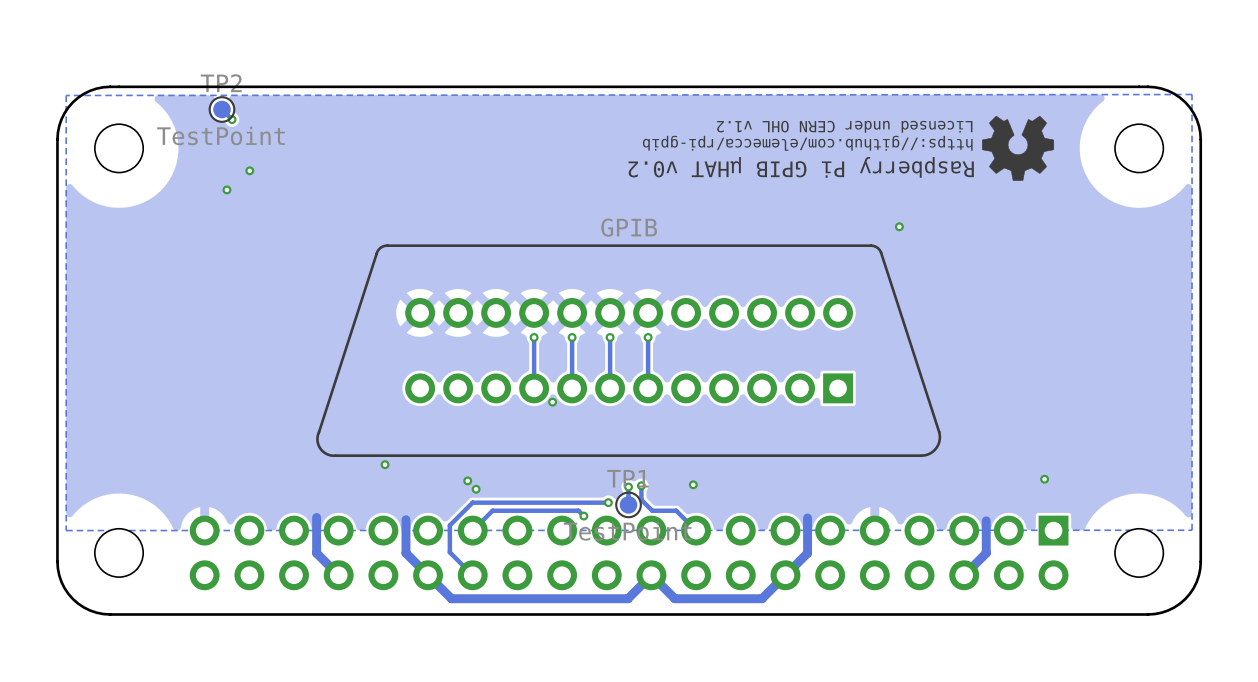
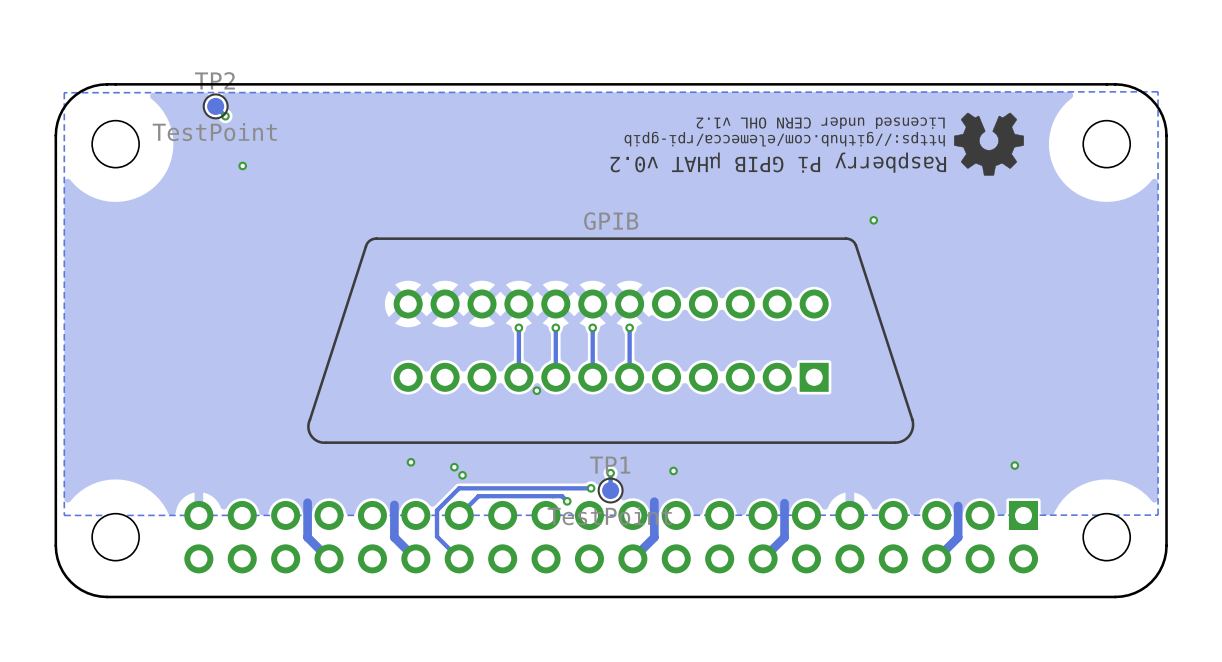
via: (226, 189) -> none
via position: (385, 464) -> (410, 462)
track: (641, 485) (641, 499) (652, 510) (676, 510) (696, 530) -> none
via: (641, 485) -> none
track: none -> (654, 501) (654, 537) (632, 558)
track: (785, 575) (762, 598) (674, 598) (651, 575) (628, 598) (451, 598) (428, 575) -> none

